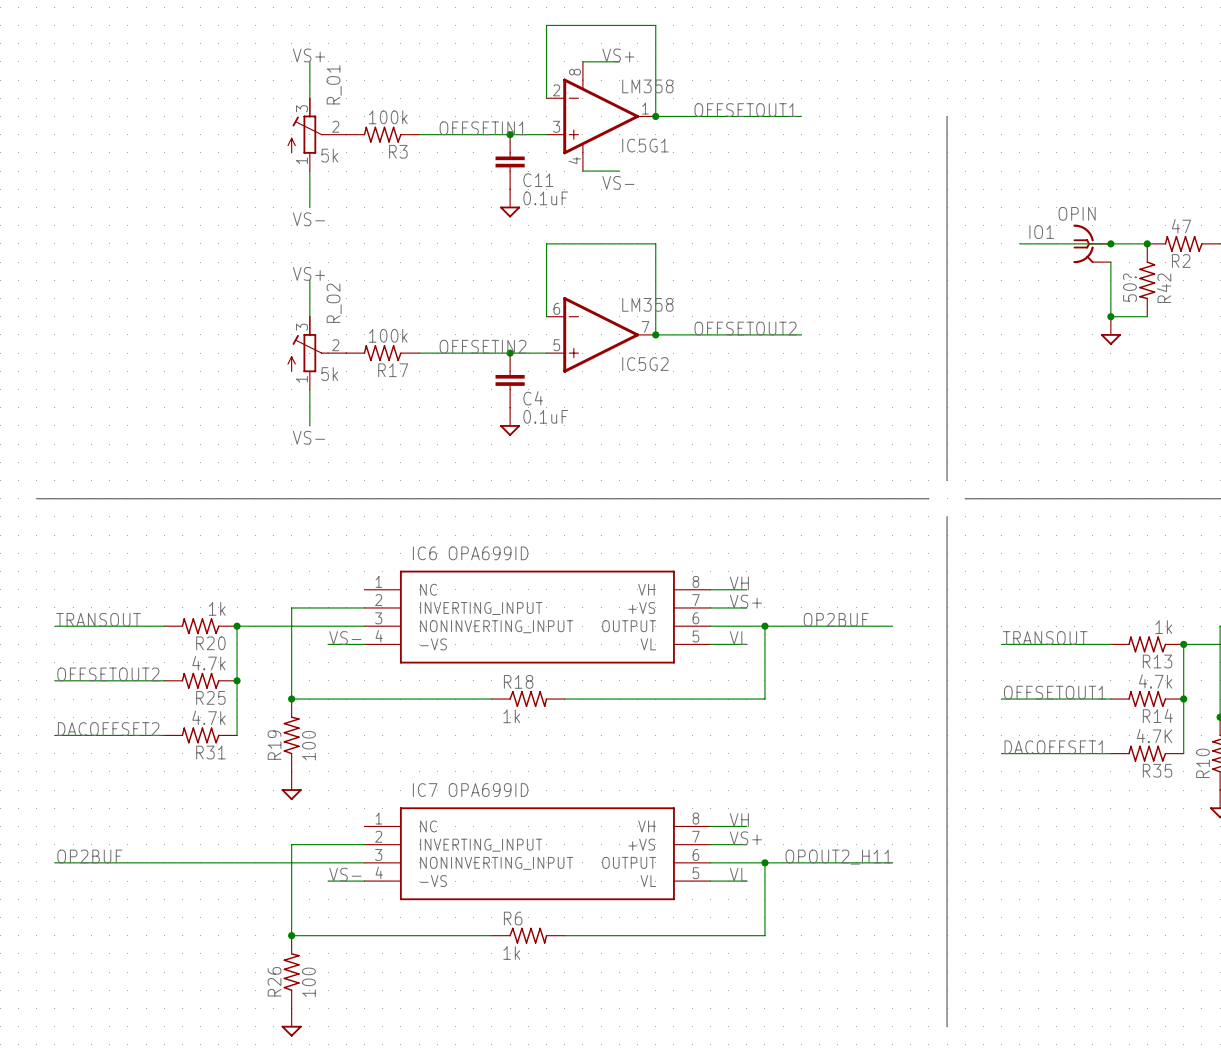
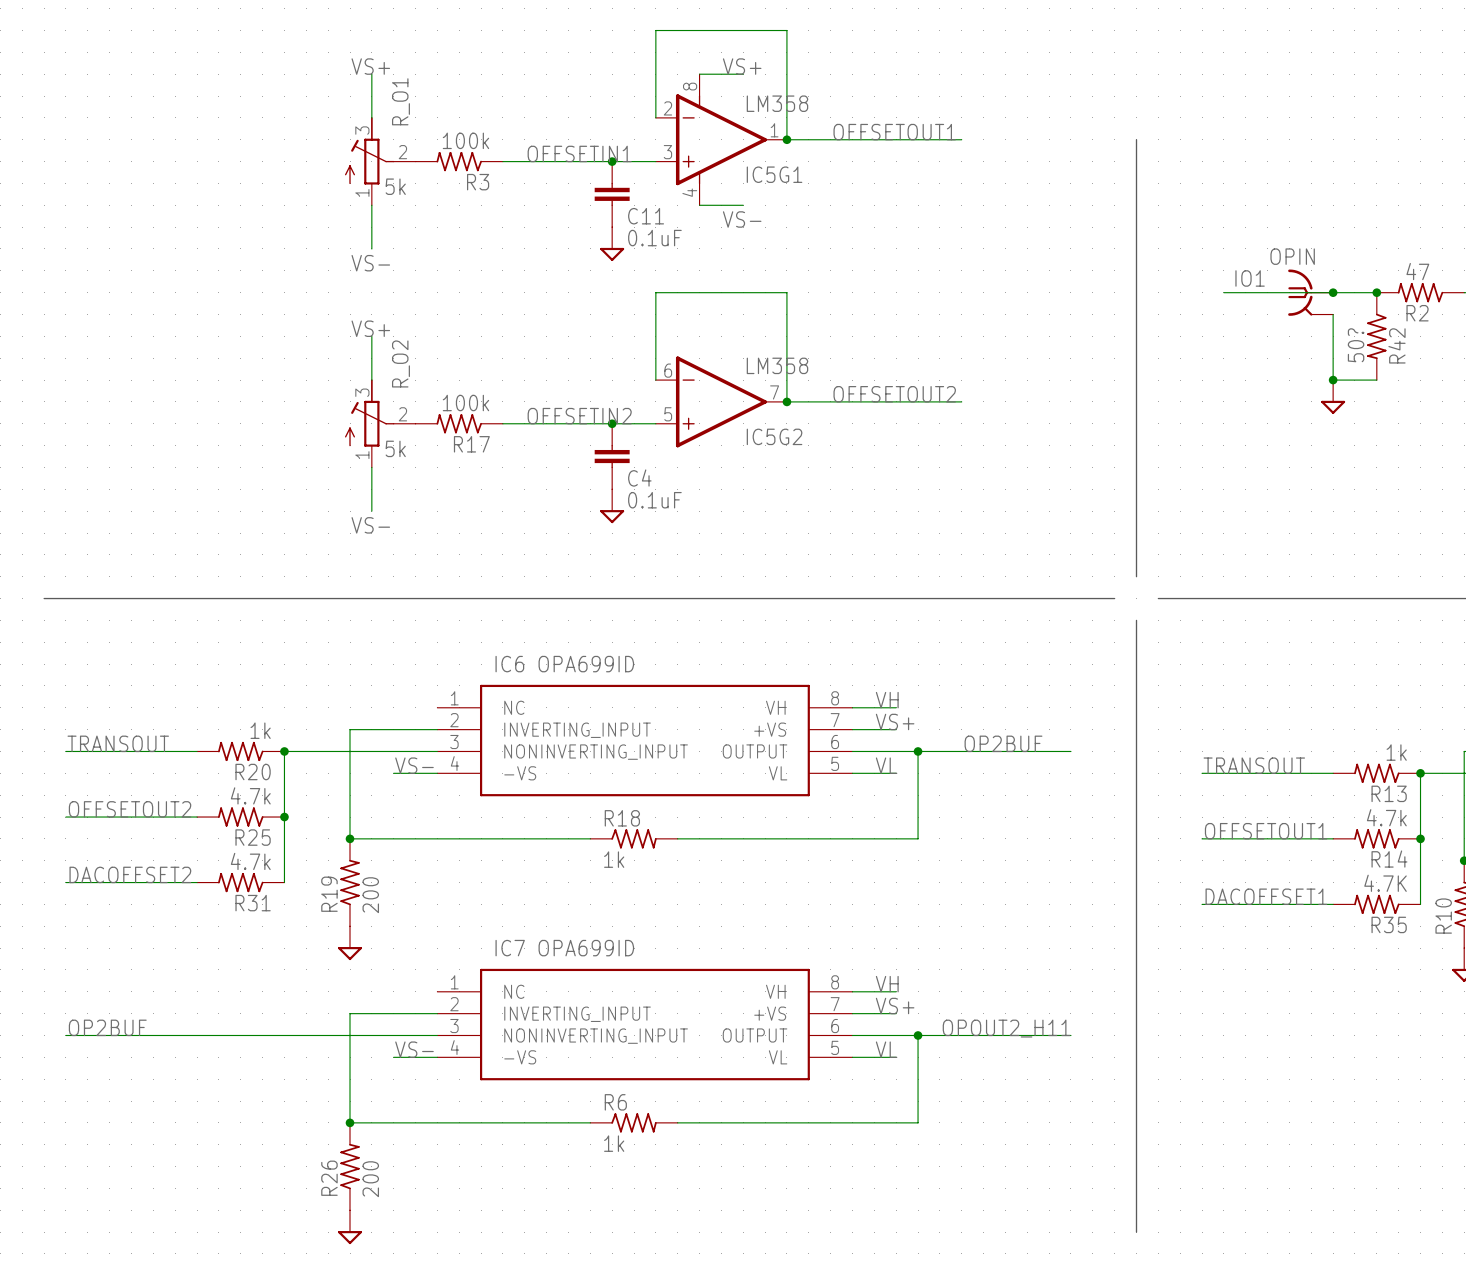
R19 value: 100 (308, 745) -> 200 (370, 895)
R26 value: 100 (308, 982) -> 200 (370, 1179)

